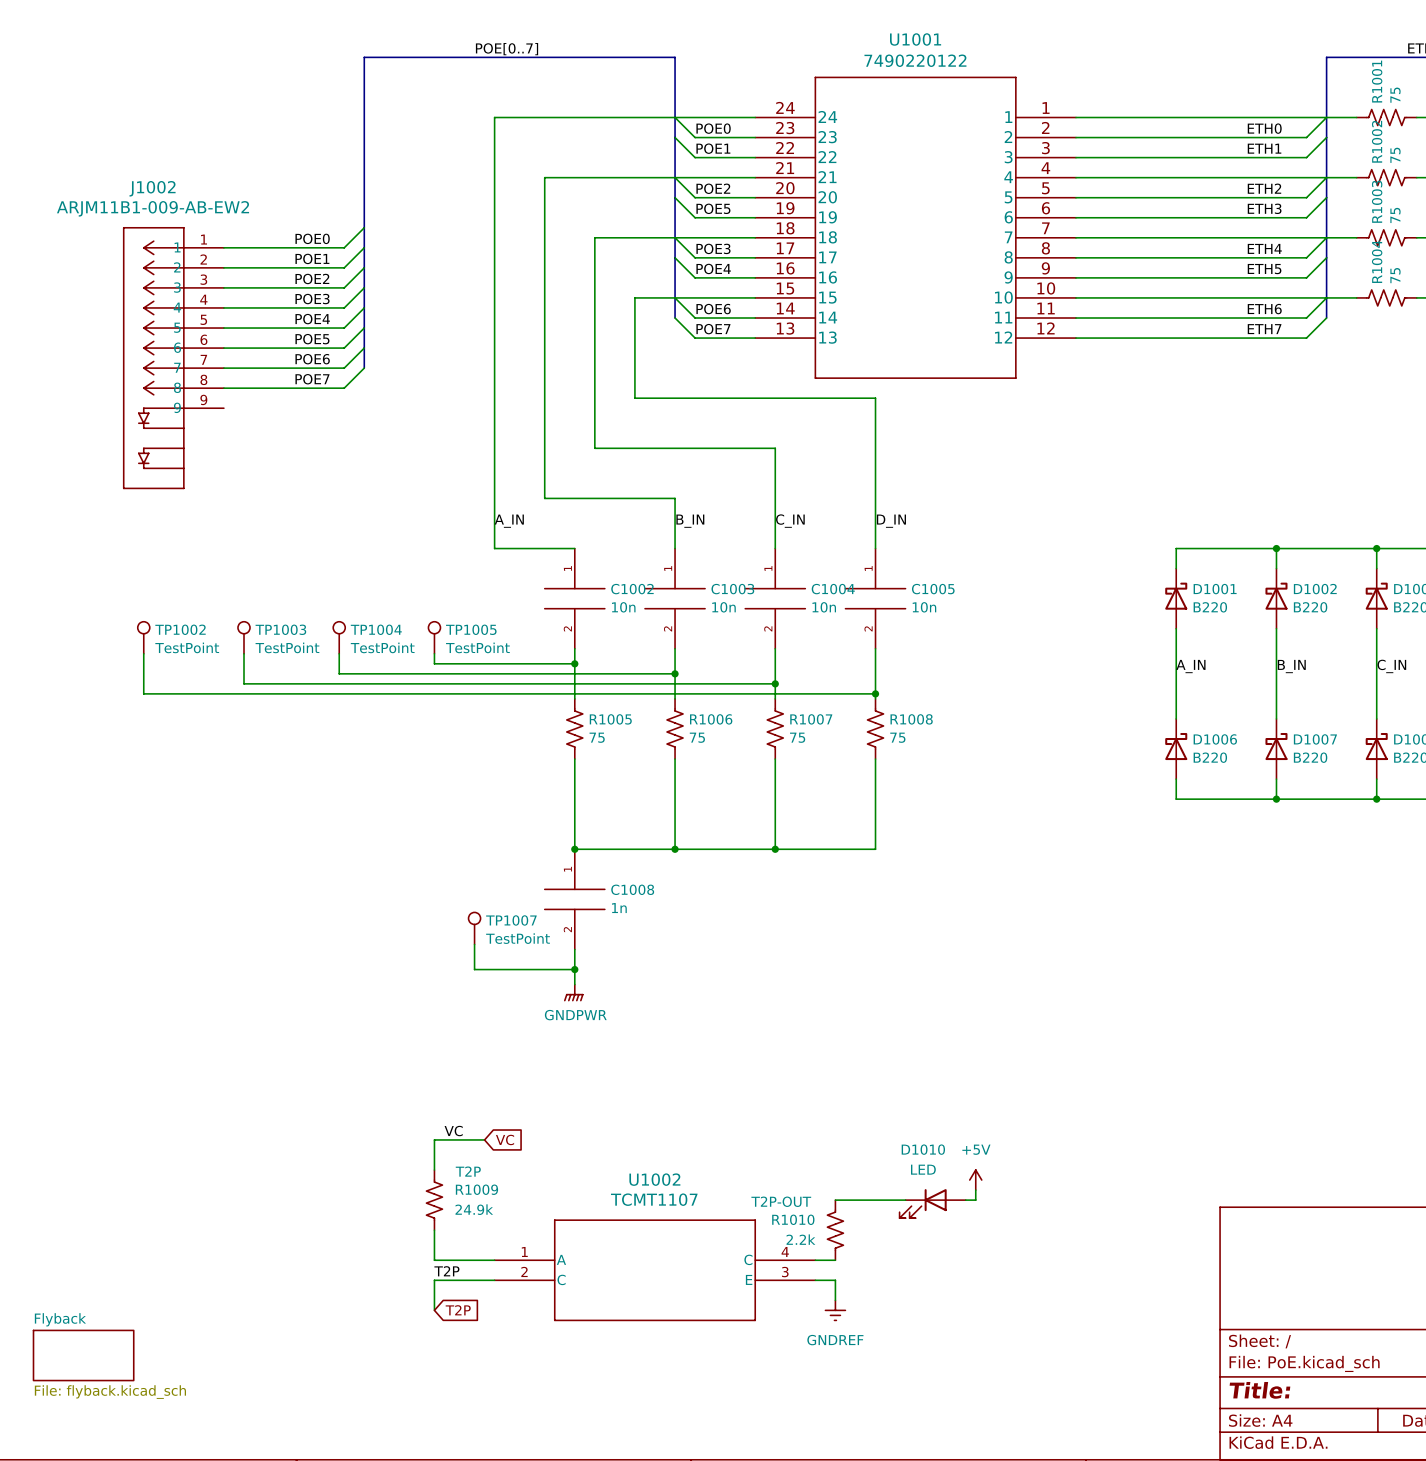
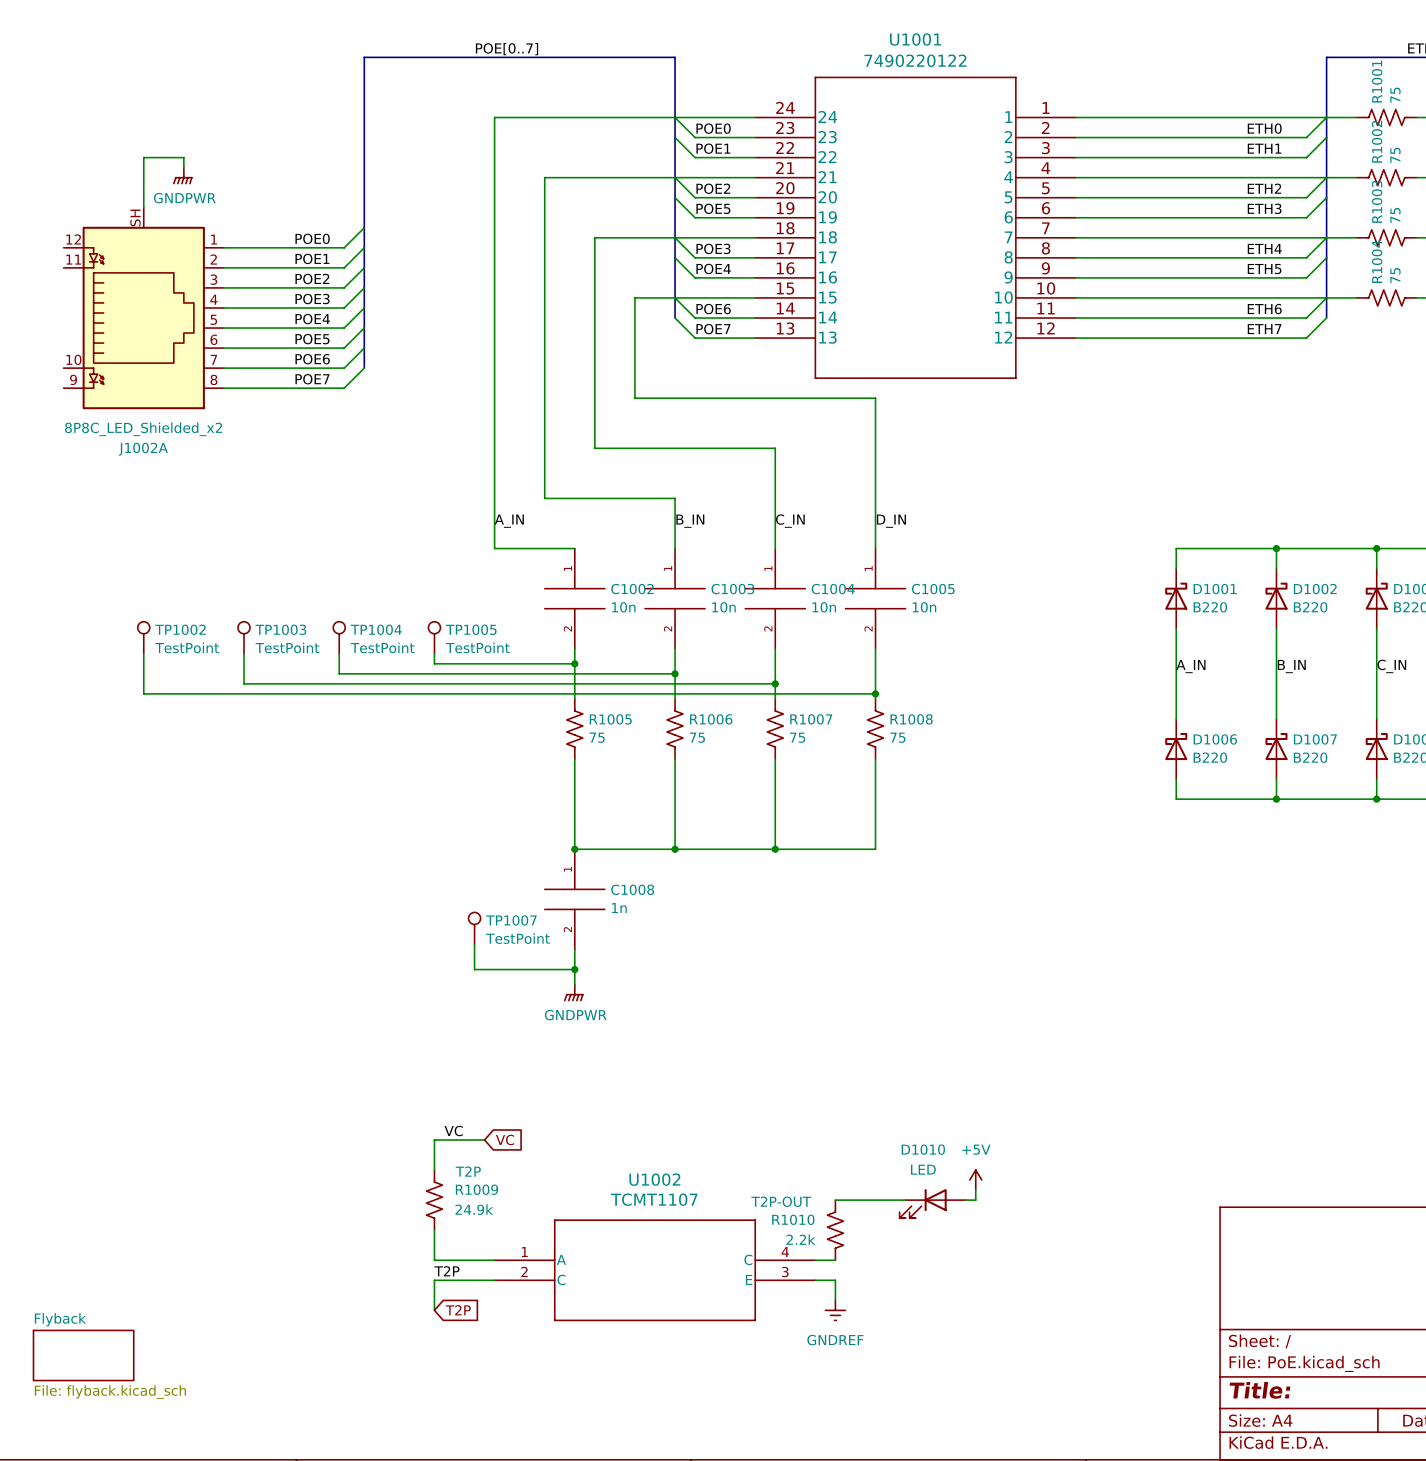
wire: none -> (183, 167) (183, 157) (143, 157) (143, 207)
power symbol: none -> GNDPWR (182, 176)
J1002A: none -> 8P8C_LED_Shielded_x2 (143, 308)
J1002: ARJM11B1-009-AB-EW2 (173, 358) -> none

